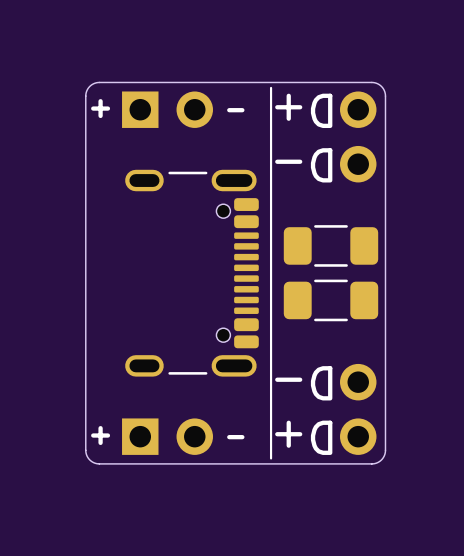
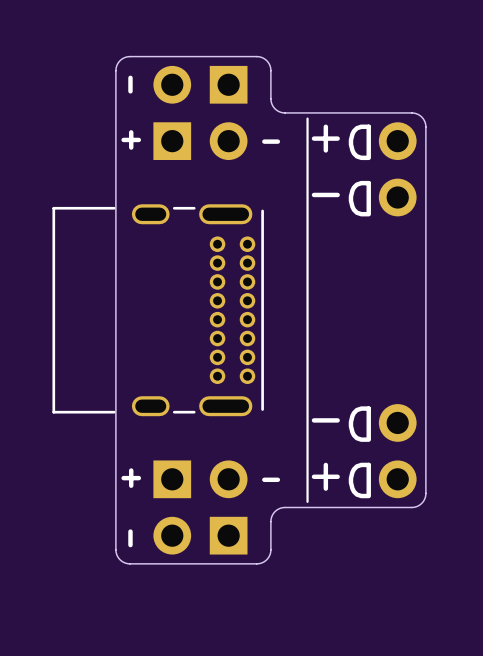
text: none -> - (130, 84)
part: none -> (200, 84)
board edge: (249, 82) (97, 82) (88, 87) (85, 96) -> (285, 112) (277, 110) (272, 104) (270, 67) (266, 60) (261, 57) (128, 56) (120, 60) (116, 67) (115, 127)
part: (330, 245) -> none
part: none -> (158, 310)
part: (191, 273) -> none
part: (330, 300) -> none
board edge: (85, 450) (88, 458) (97, 463) (249, 463) -> (115, 493) (116, 552) (121, 560) (128, 563) (261, 563) (266, 559) (270, 552) (272, 515) (277, 509) (285, 507)
part: none -> (200, 535)
text: none -> - (130, 538)

